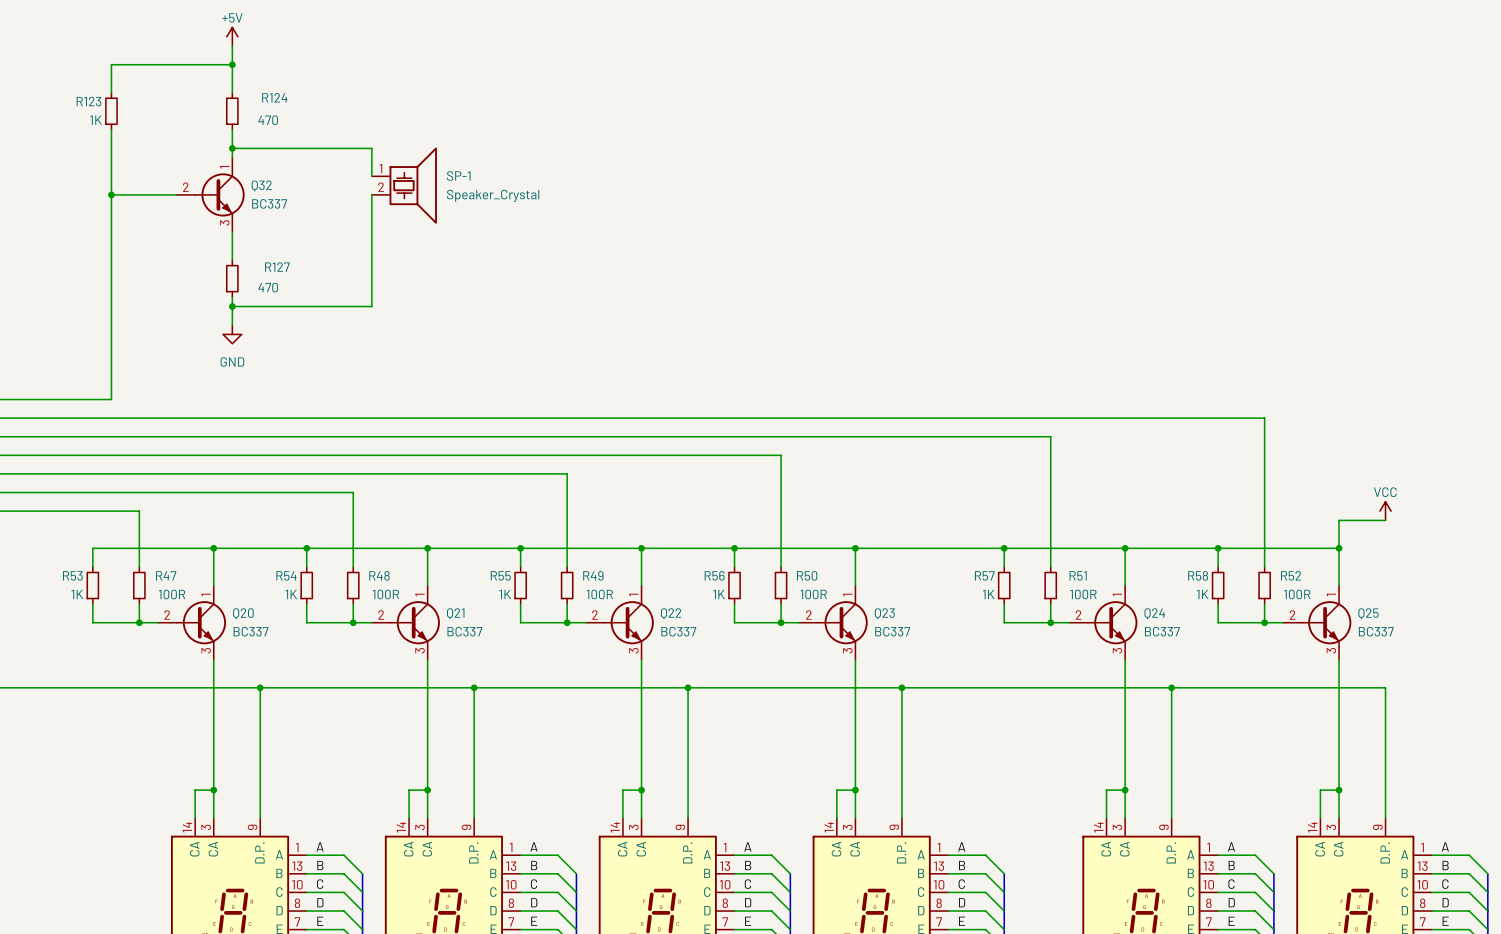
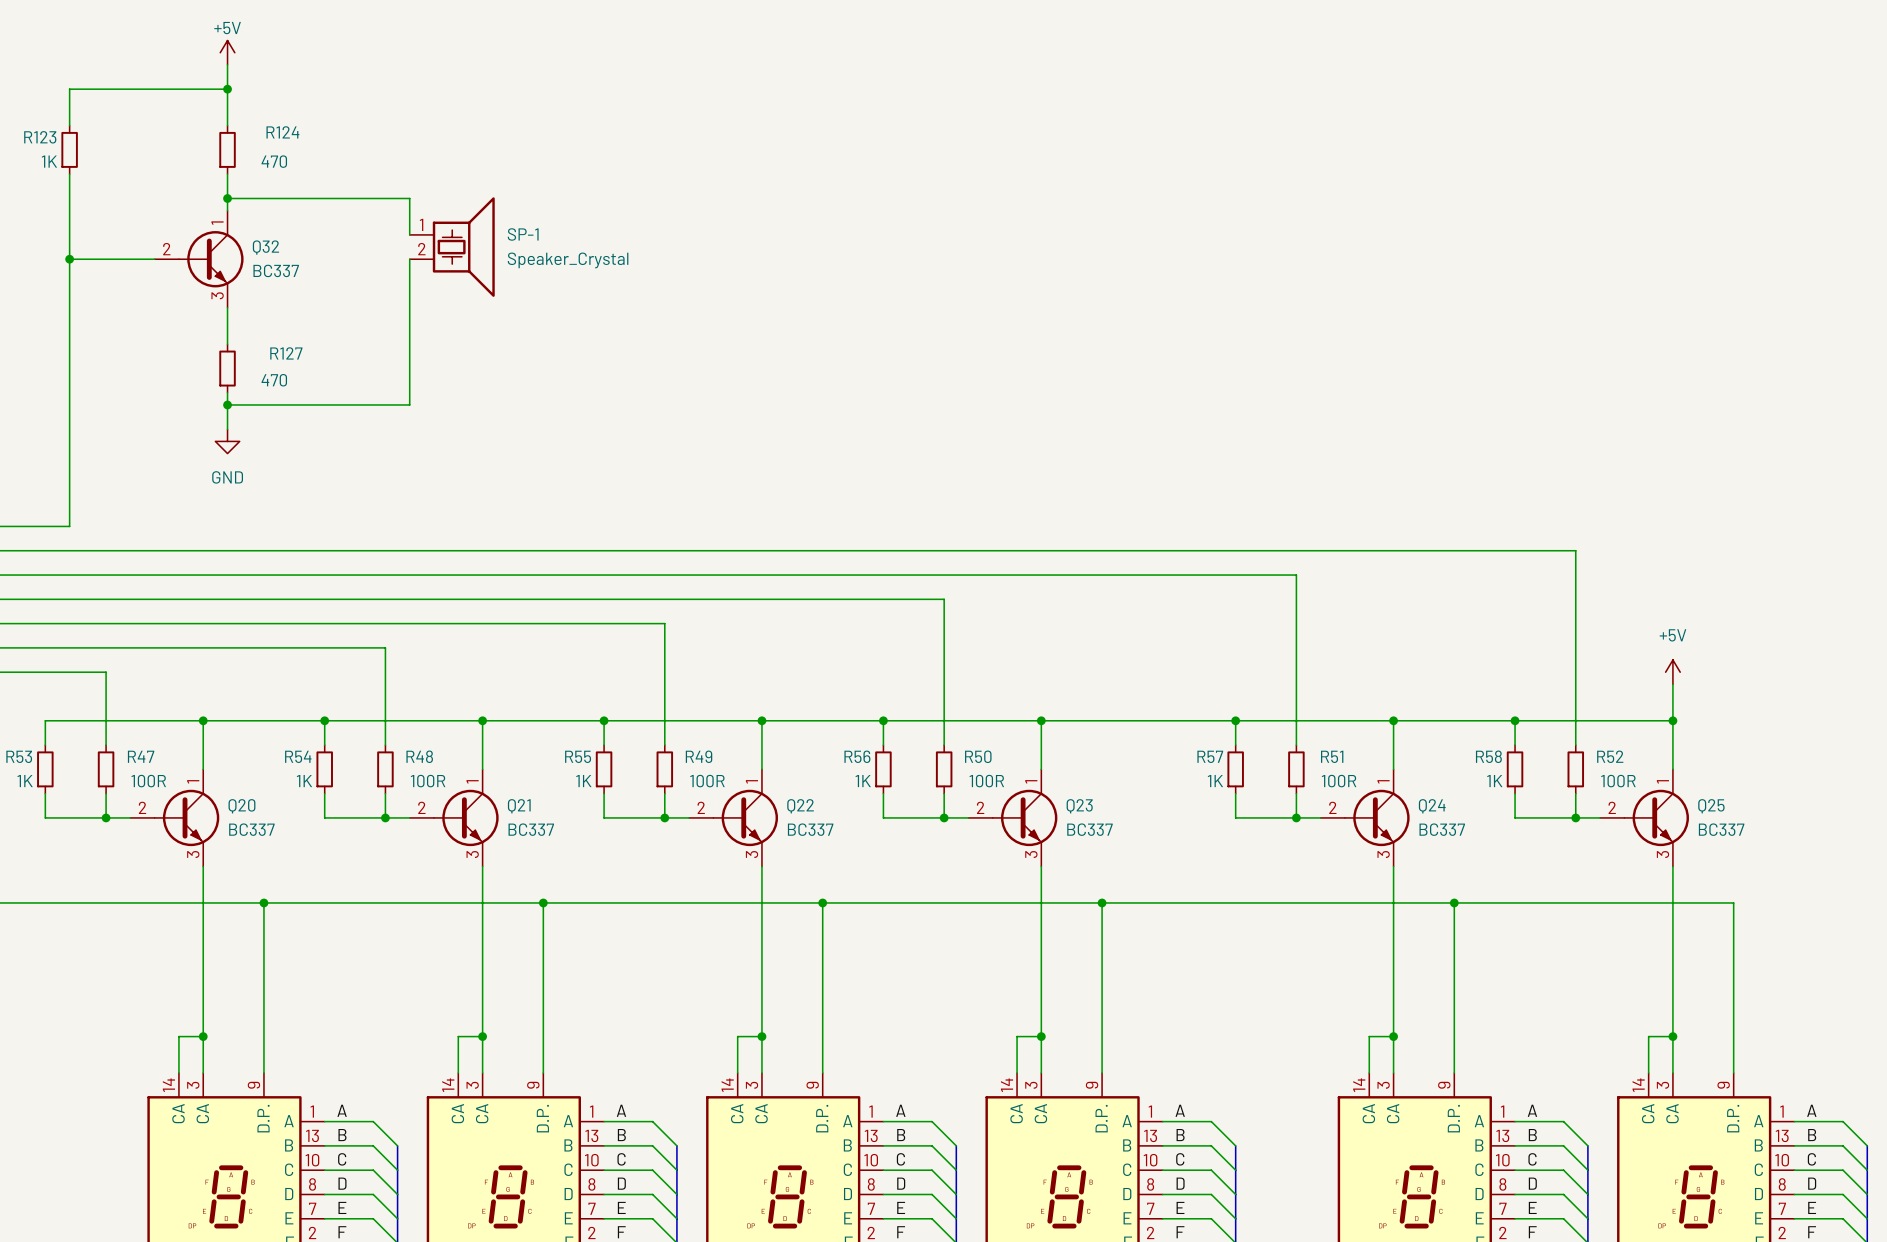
power symbol: none -> +5V (1672, 672)
power symbol: VCC (1385, 511) -> none
wire: (1339, 520) (1385, 520) -> none

